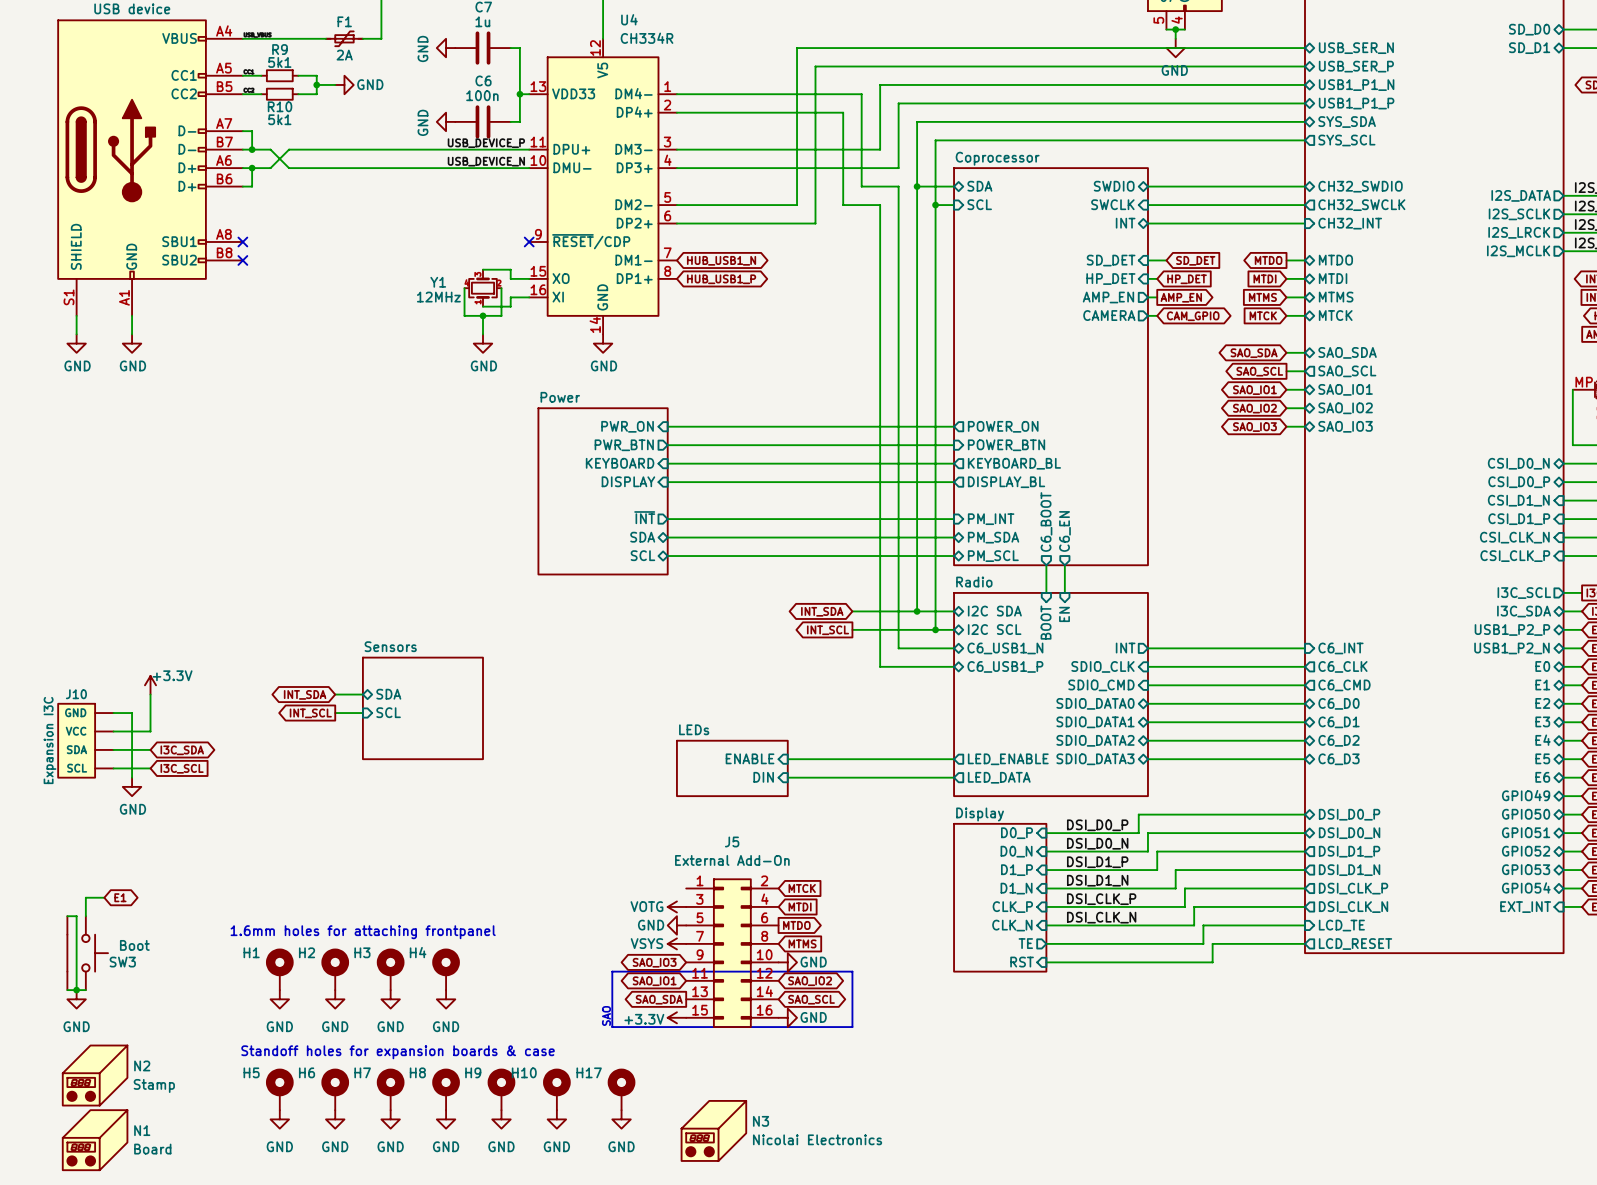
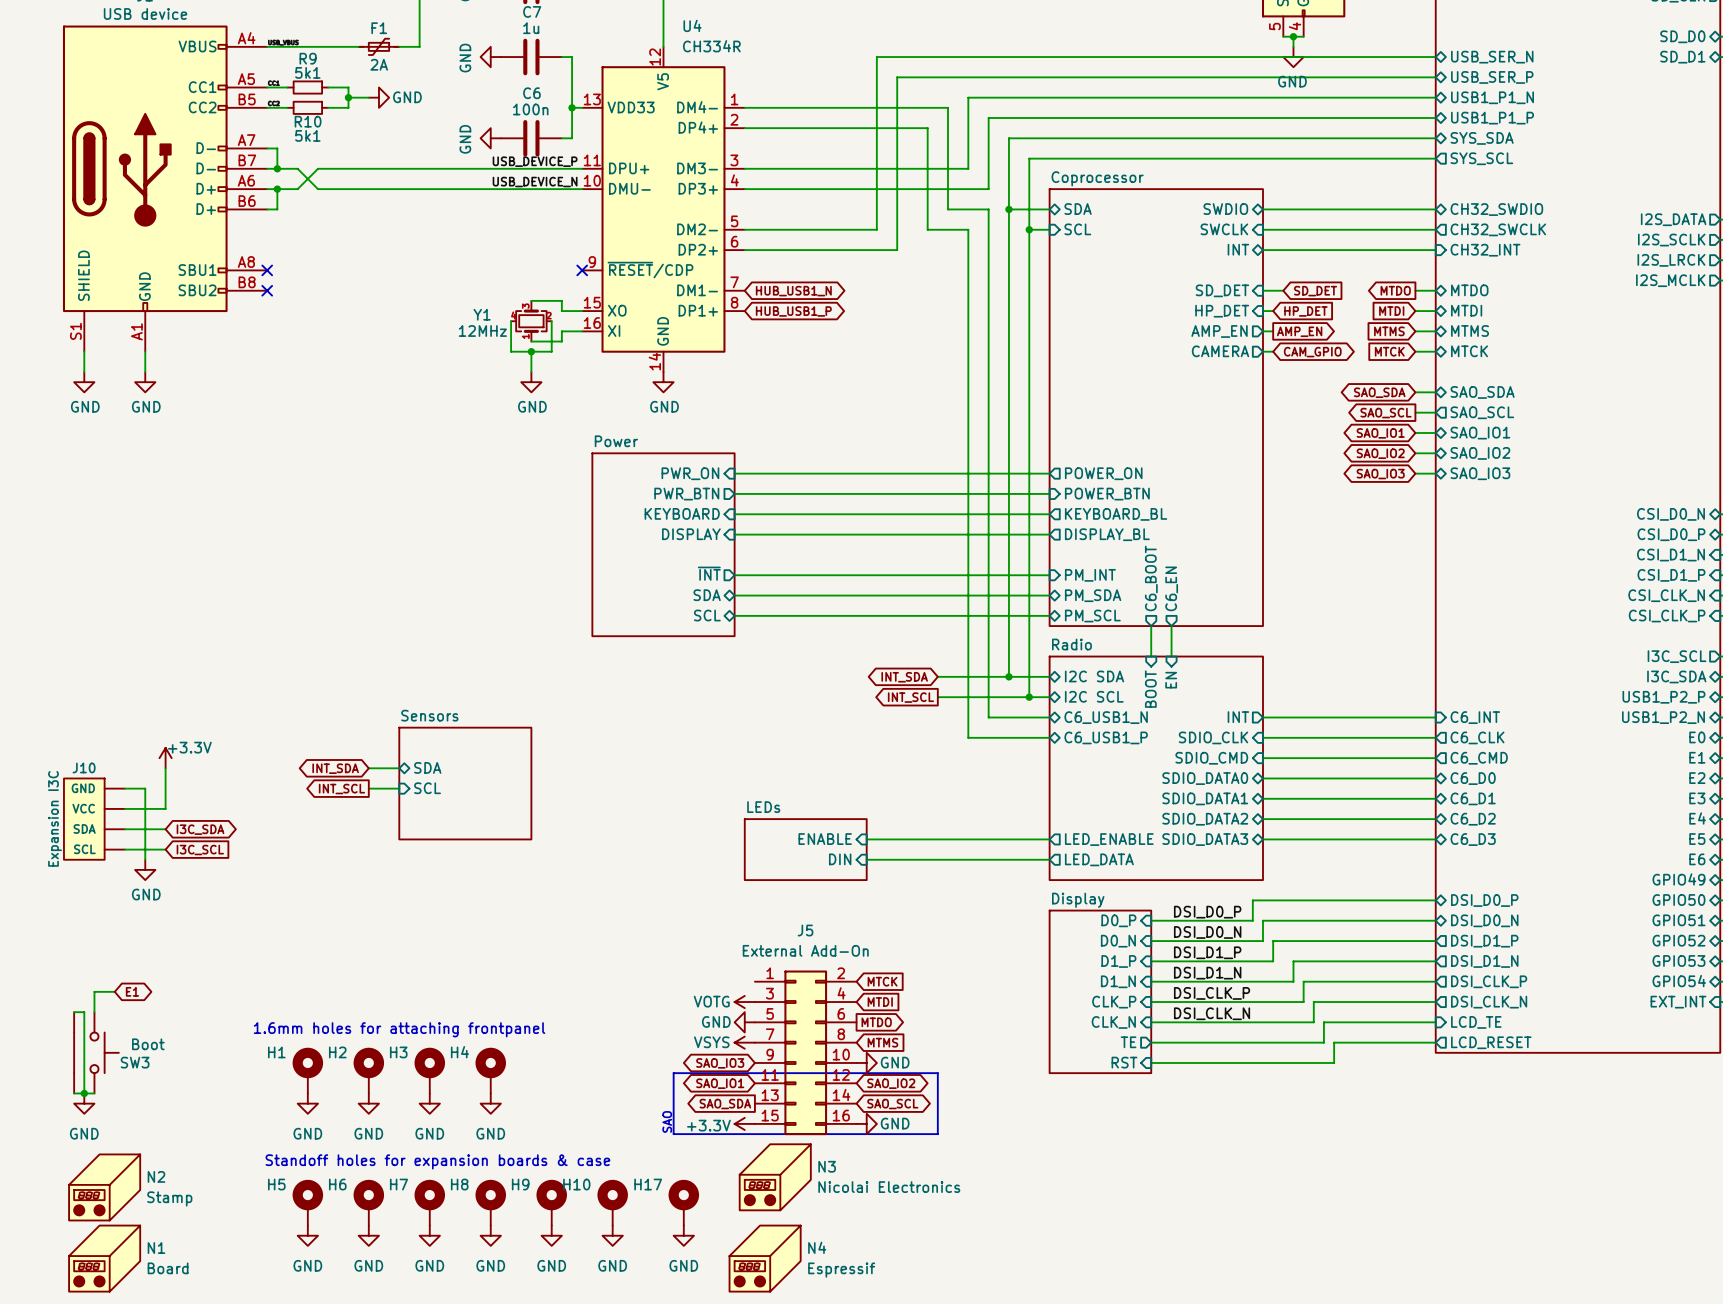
N3 position: (713, 1130) -> (775, 1177)
N4: none -> Espressif (765, 1258)

